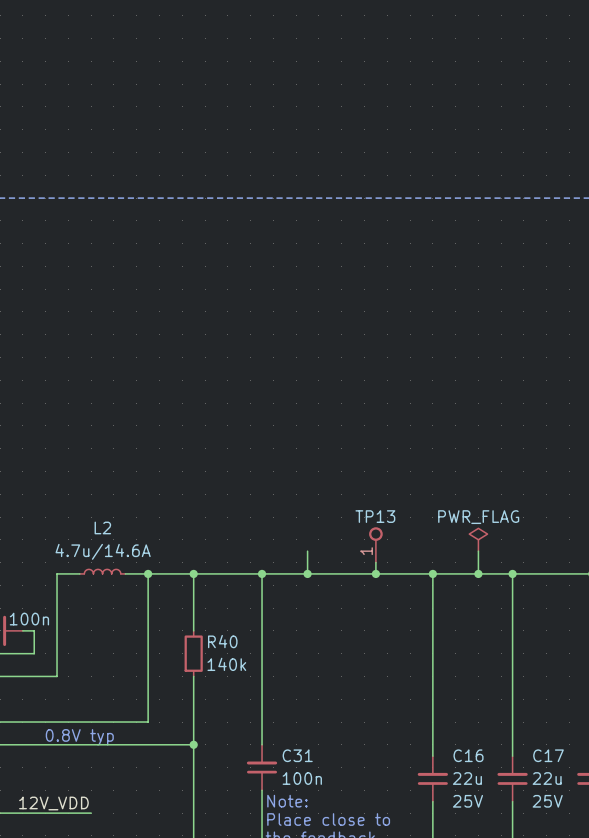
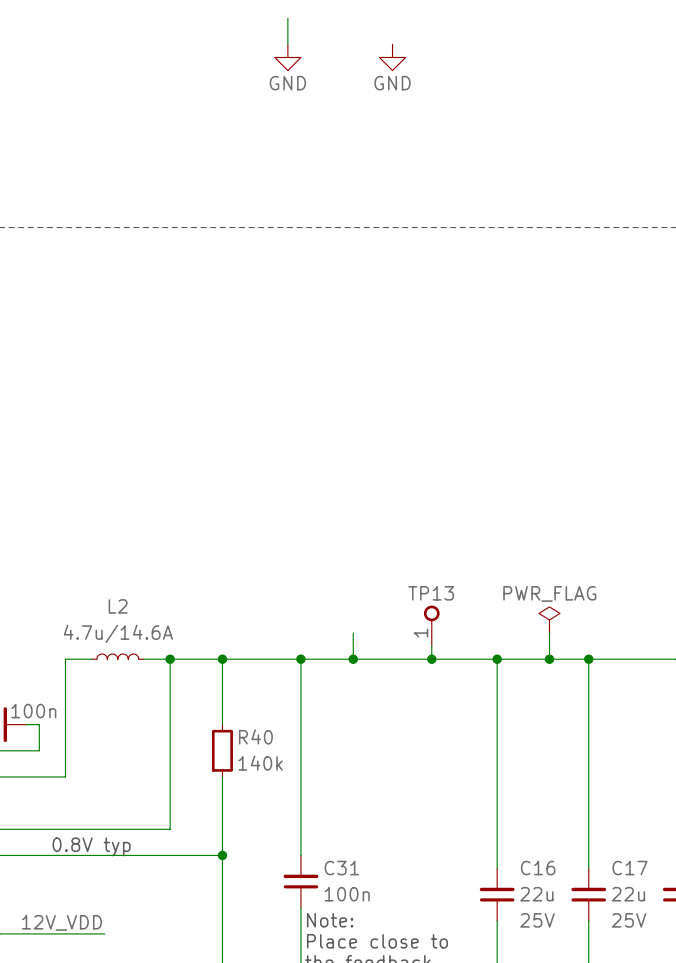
wire: none -> (287, 18) (287, 44)
power symbol: none -> GND (287, 57)
power symbol: none -> GND (392, 57)

